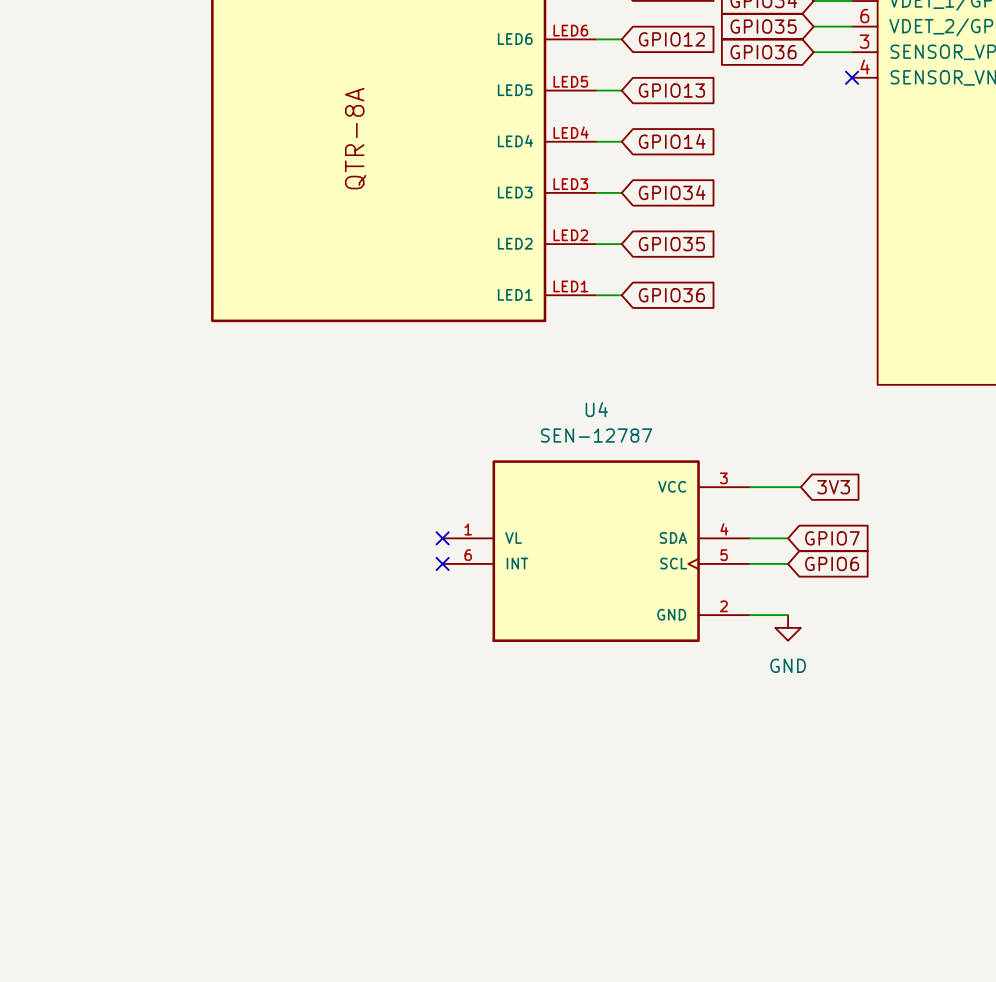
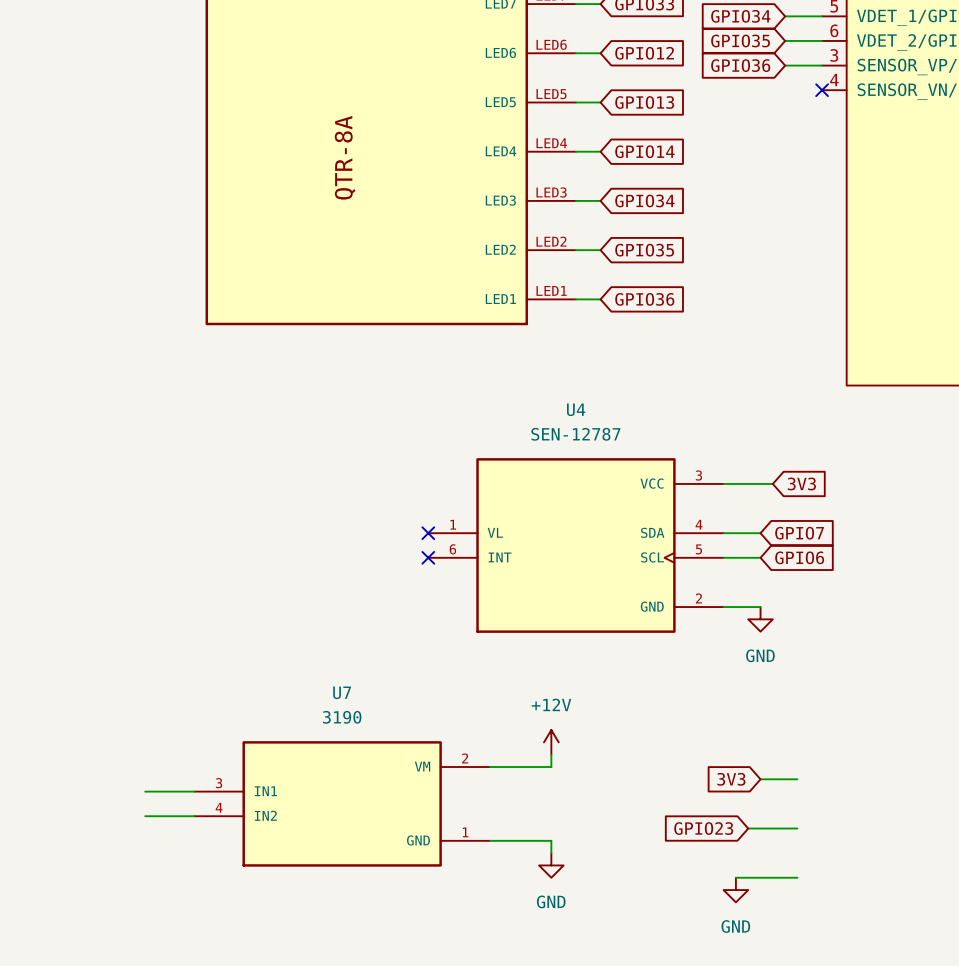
power symbol: none -> +12V (551, 742)
wire: none -> (551, 754) (551, 767) (489, 767)
global label: none -> 3V3 (731, 779)
wire: none -> (760, 779) (797, 779)
wire: none -> (145, 791) (194, 791)
U7: none -> 3190 (342, 803)
wire: none -> (145, 816) (194, 816)
global label: none -> GPIO23 (703, 828)
wire: none -> (748, 828) (797, 828)
wire: none -> (489, 840) (551, 840) (551, 853)
power symbol: none -> GND (551, 865)
wire: none -> (735, 877) (797, 877)
power symbol: none -> GND (735, 890)

